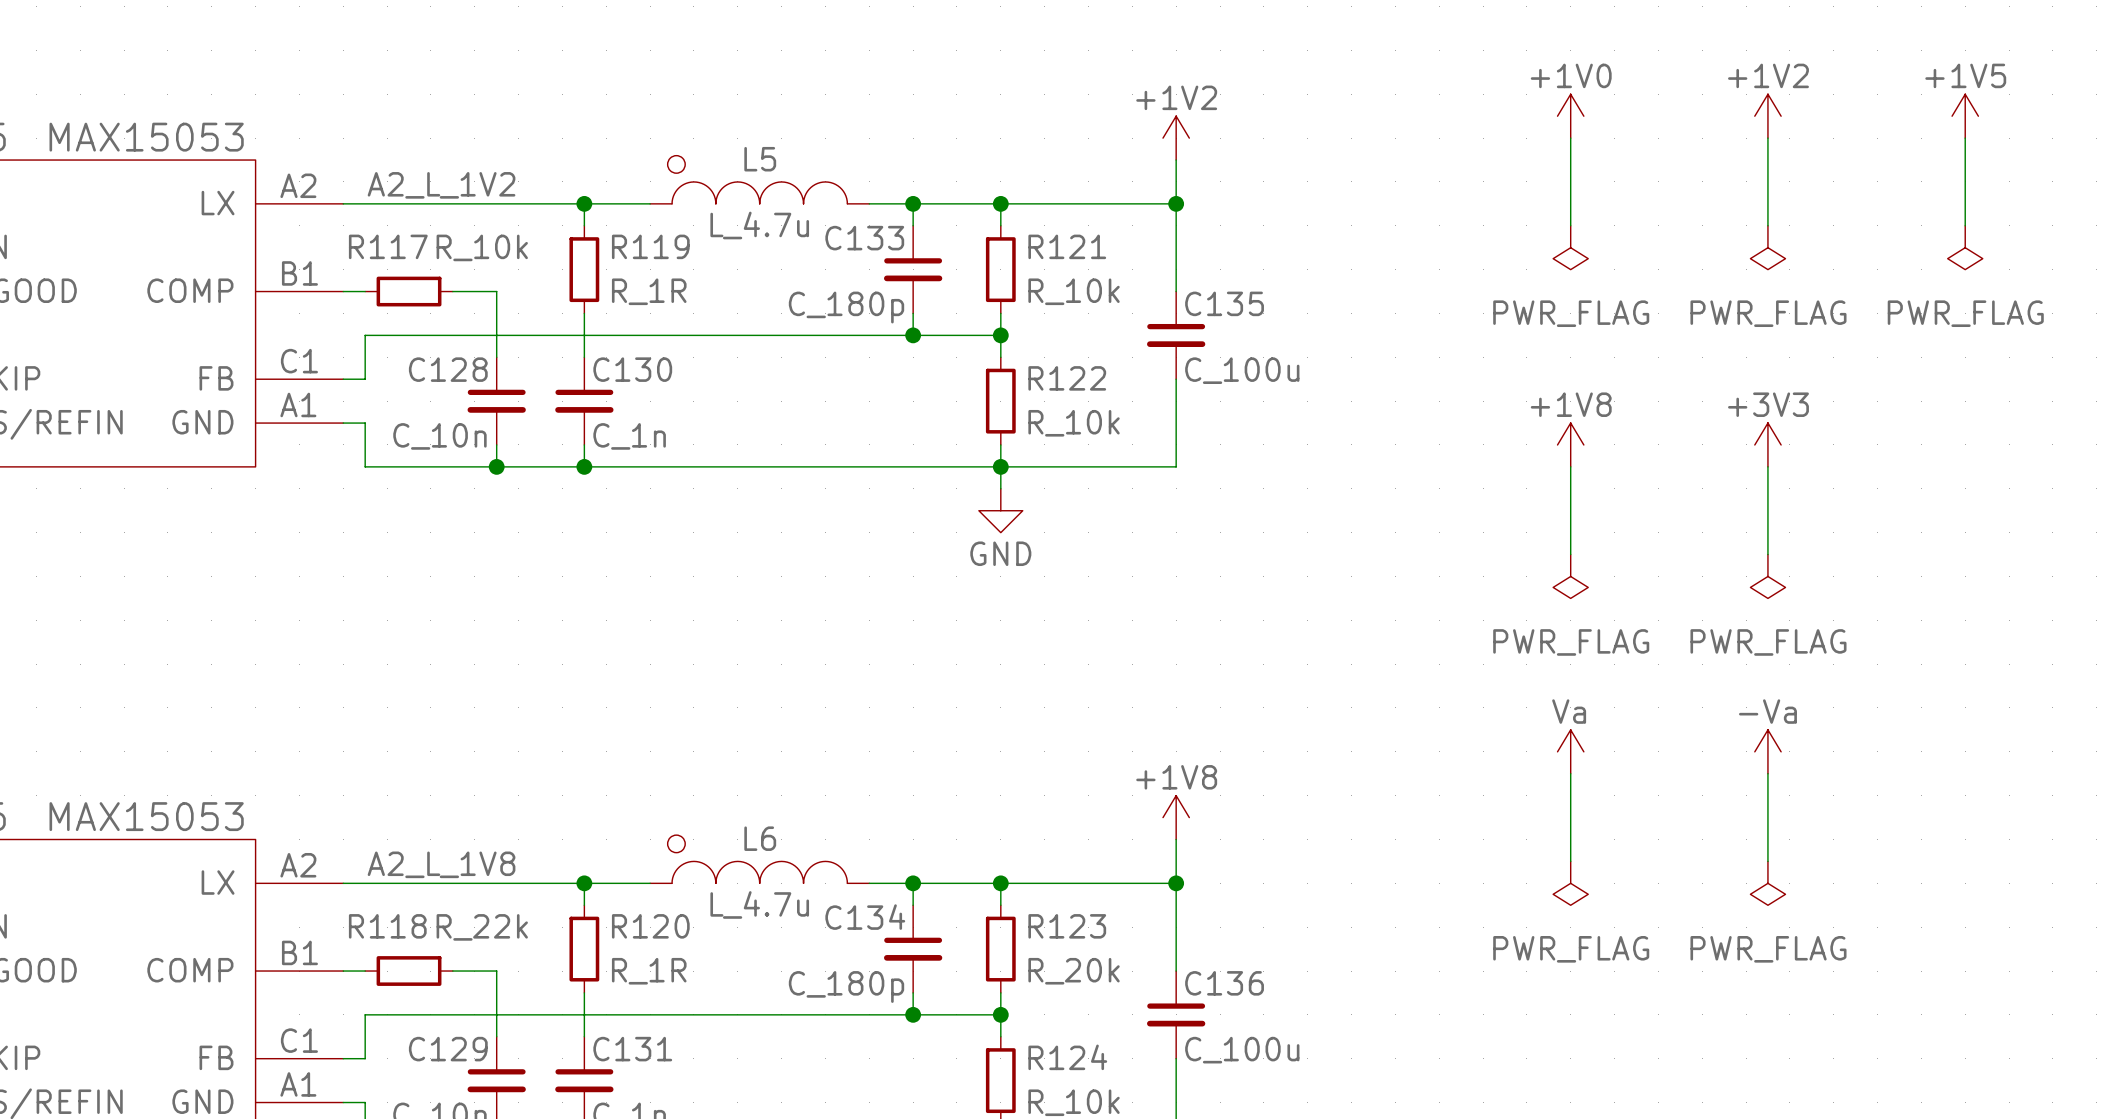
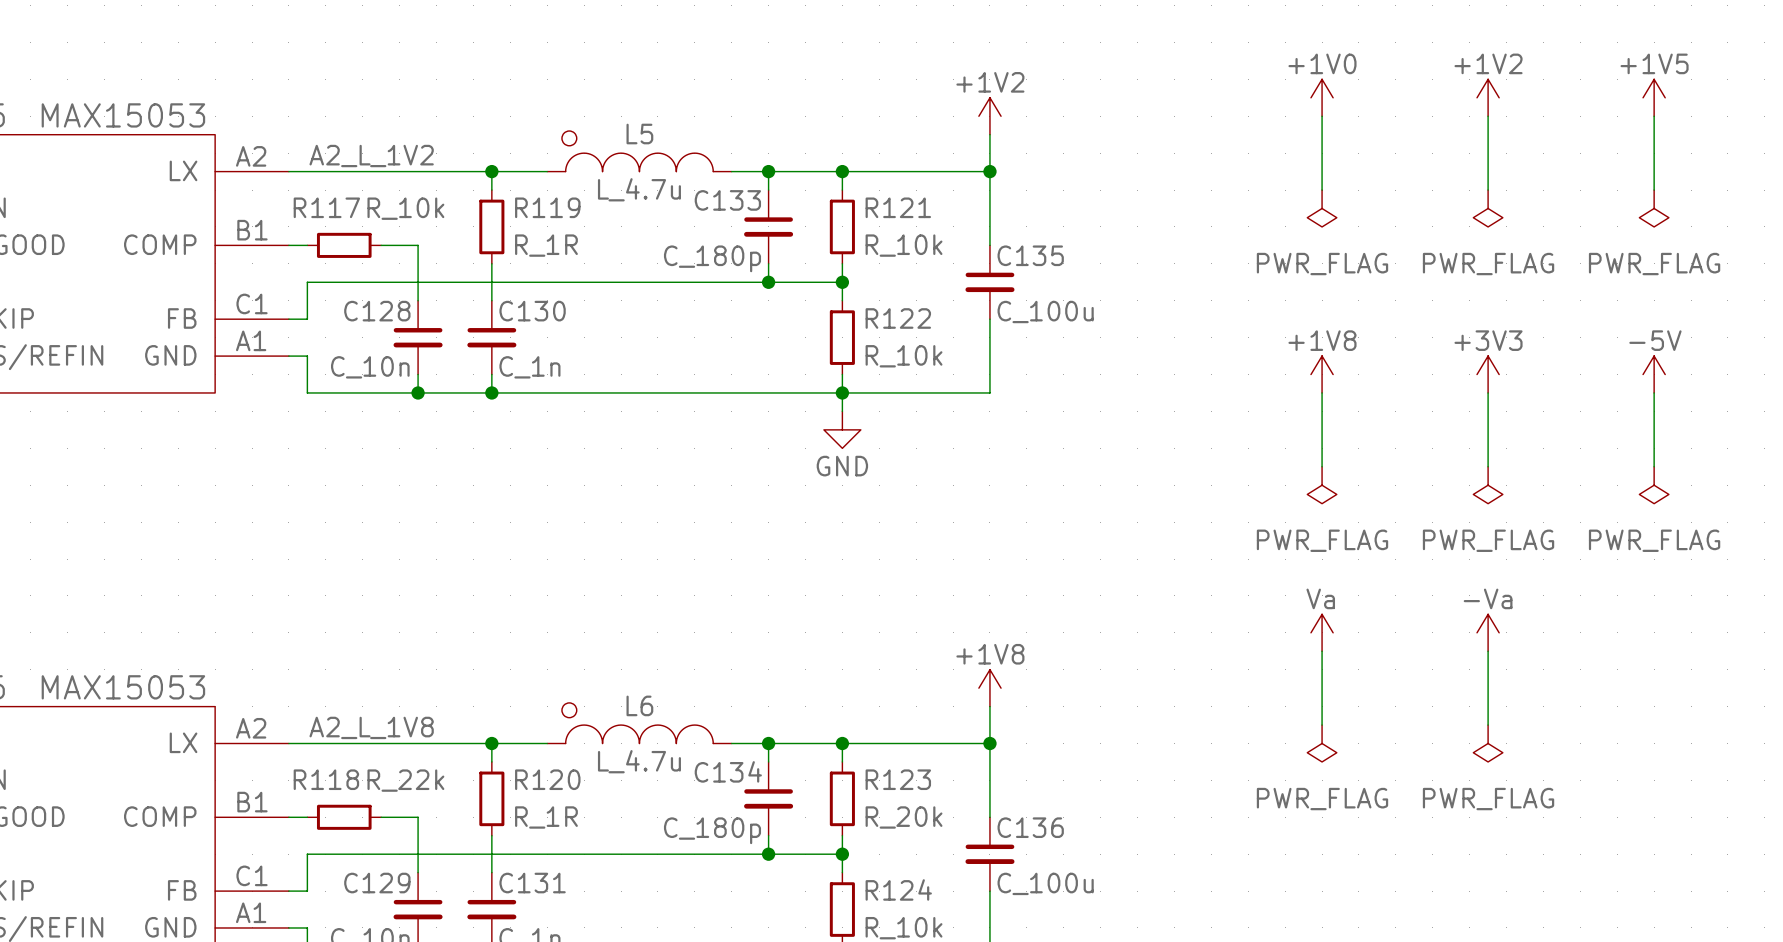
power symbol: none -> -5V (1654, 374)
wire: none -> (1654, 392) (1654, 466)
power symbol: none -> PWR_FLAG (1654, 485)

